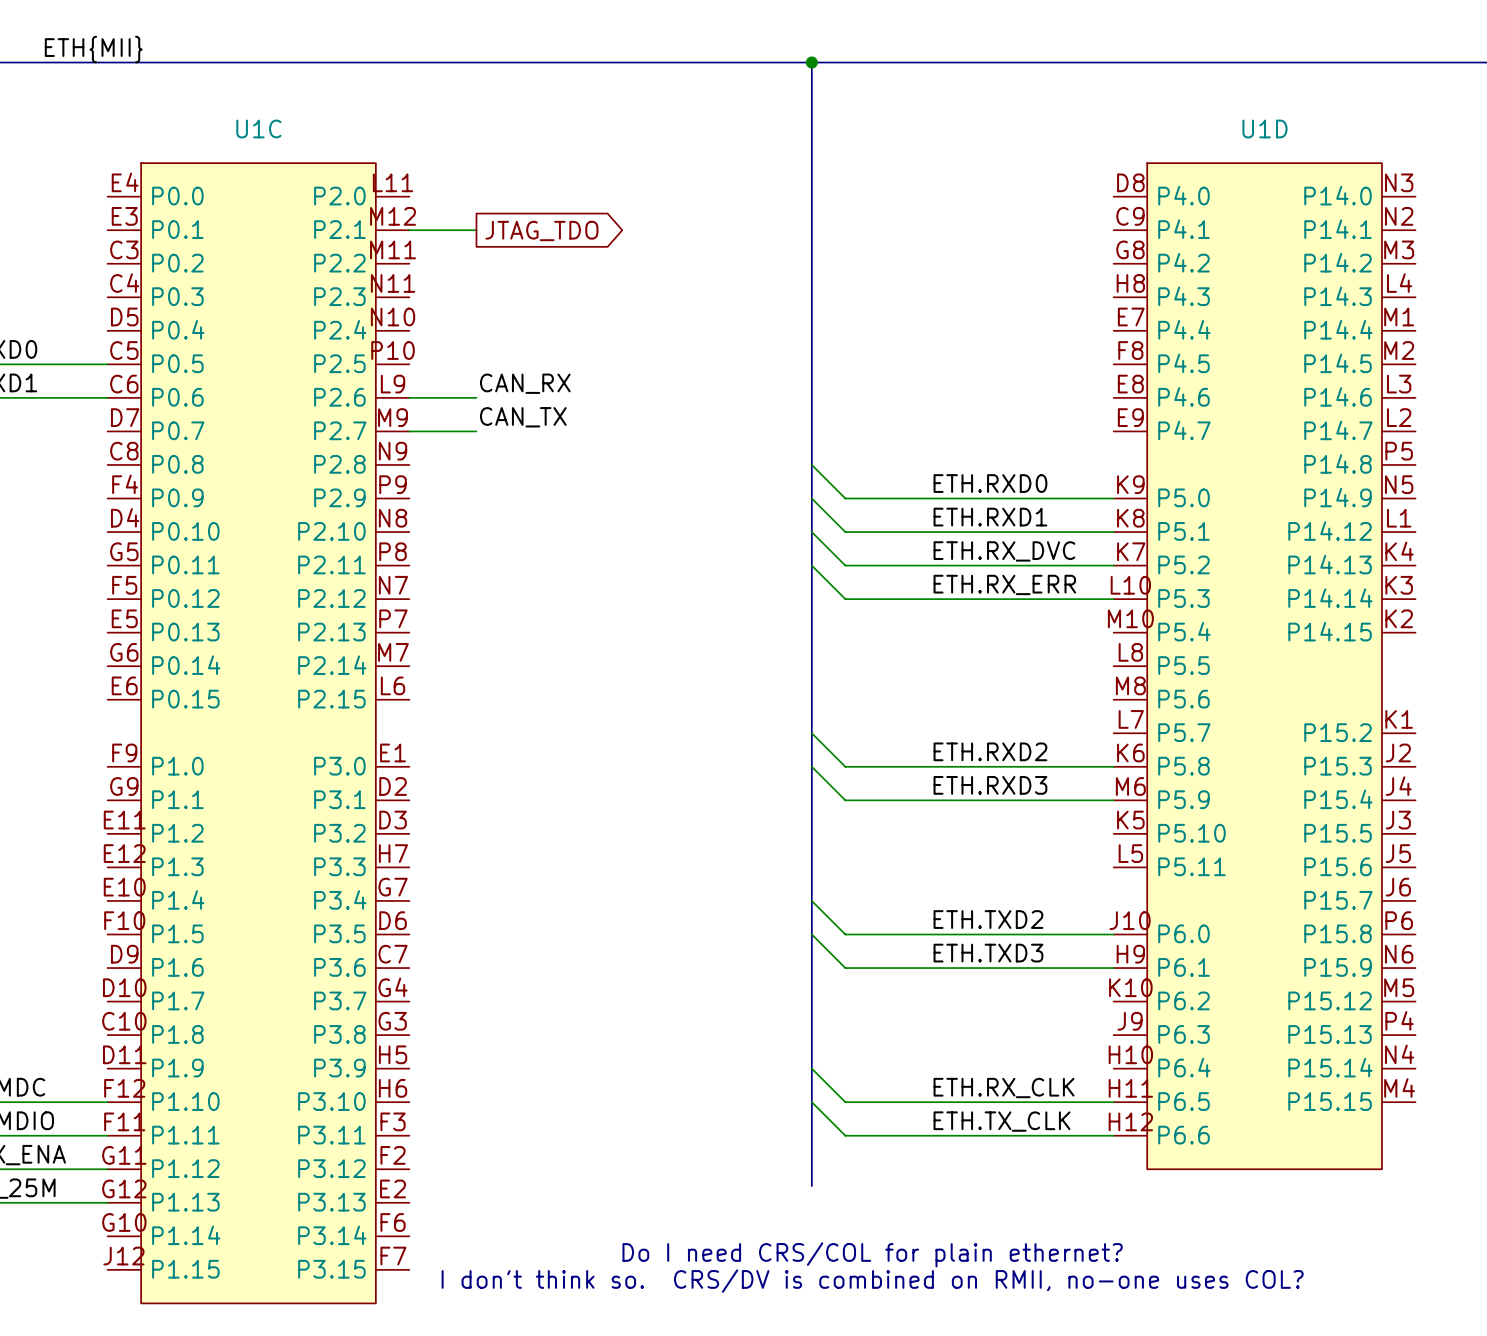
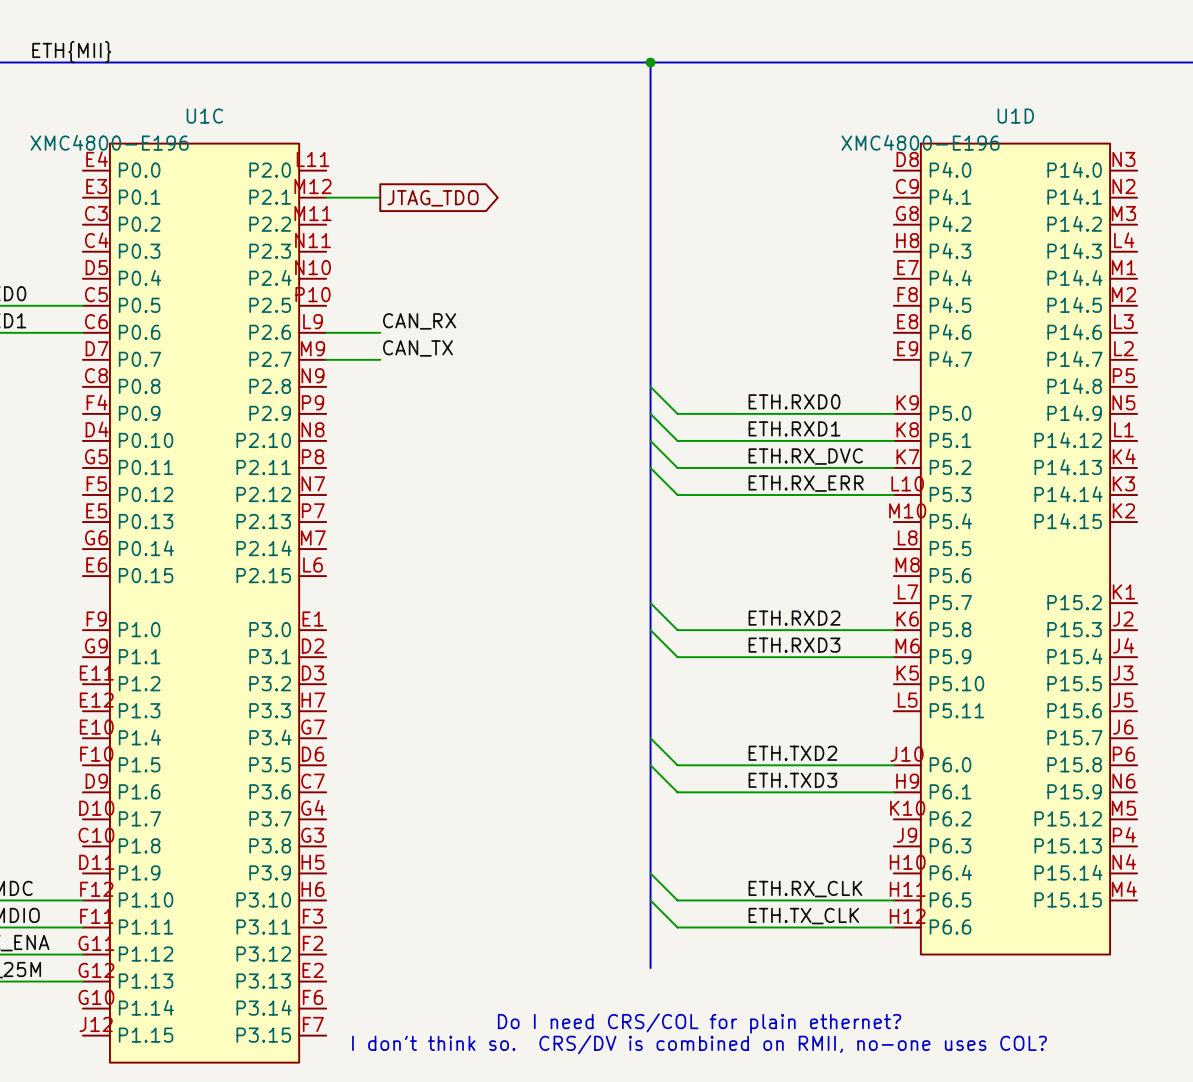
U1C value: none -> XMC4800-E196 (109, 142)
U1D value: none -> XMC4800-E196 (920, 142)

